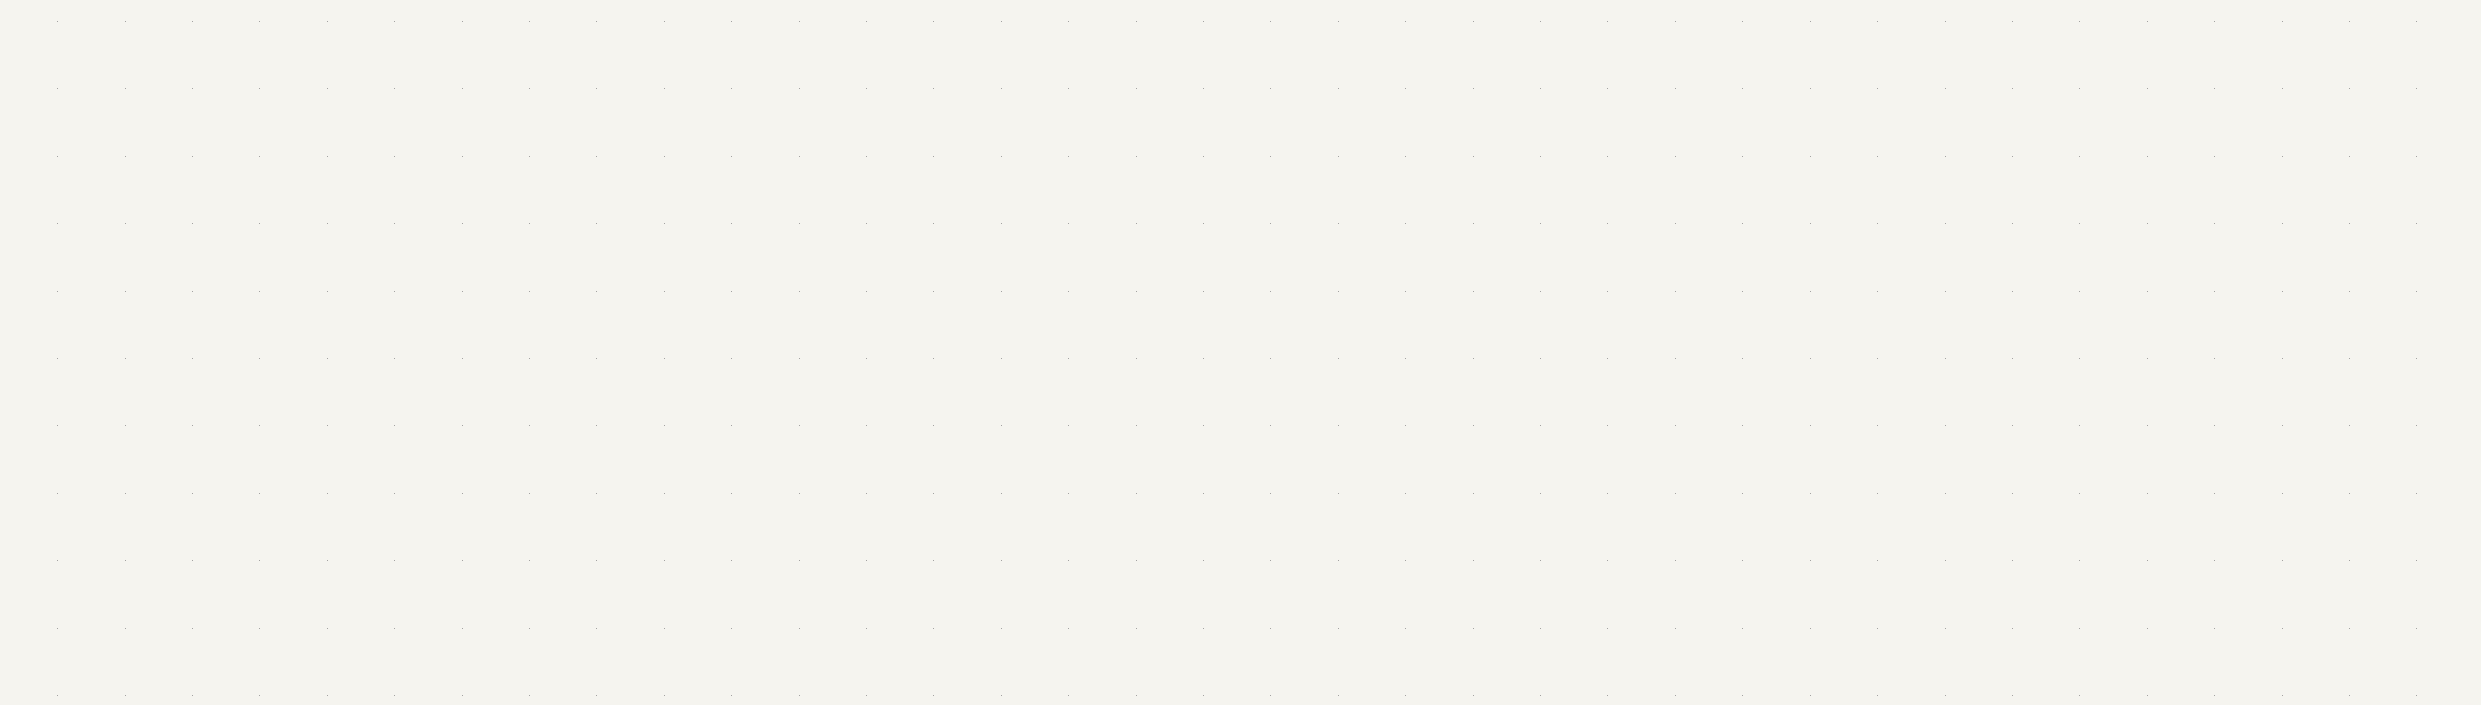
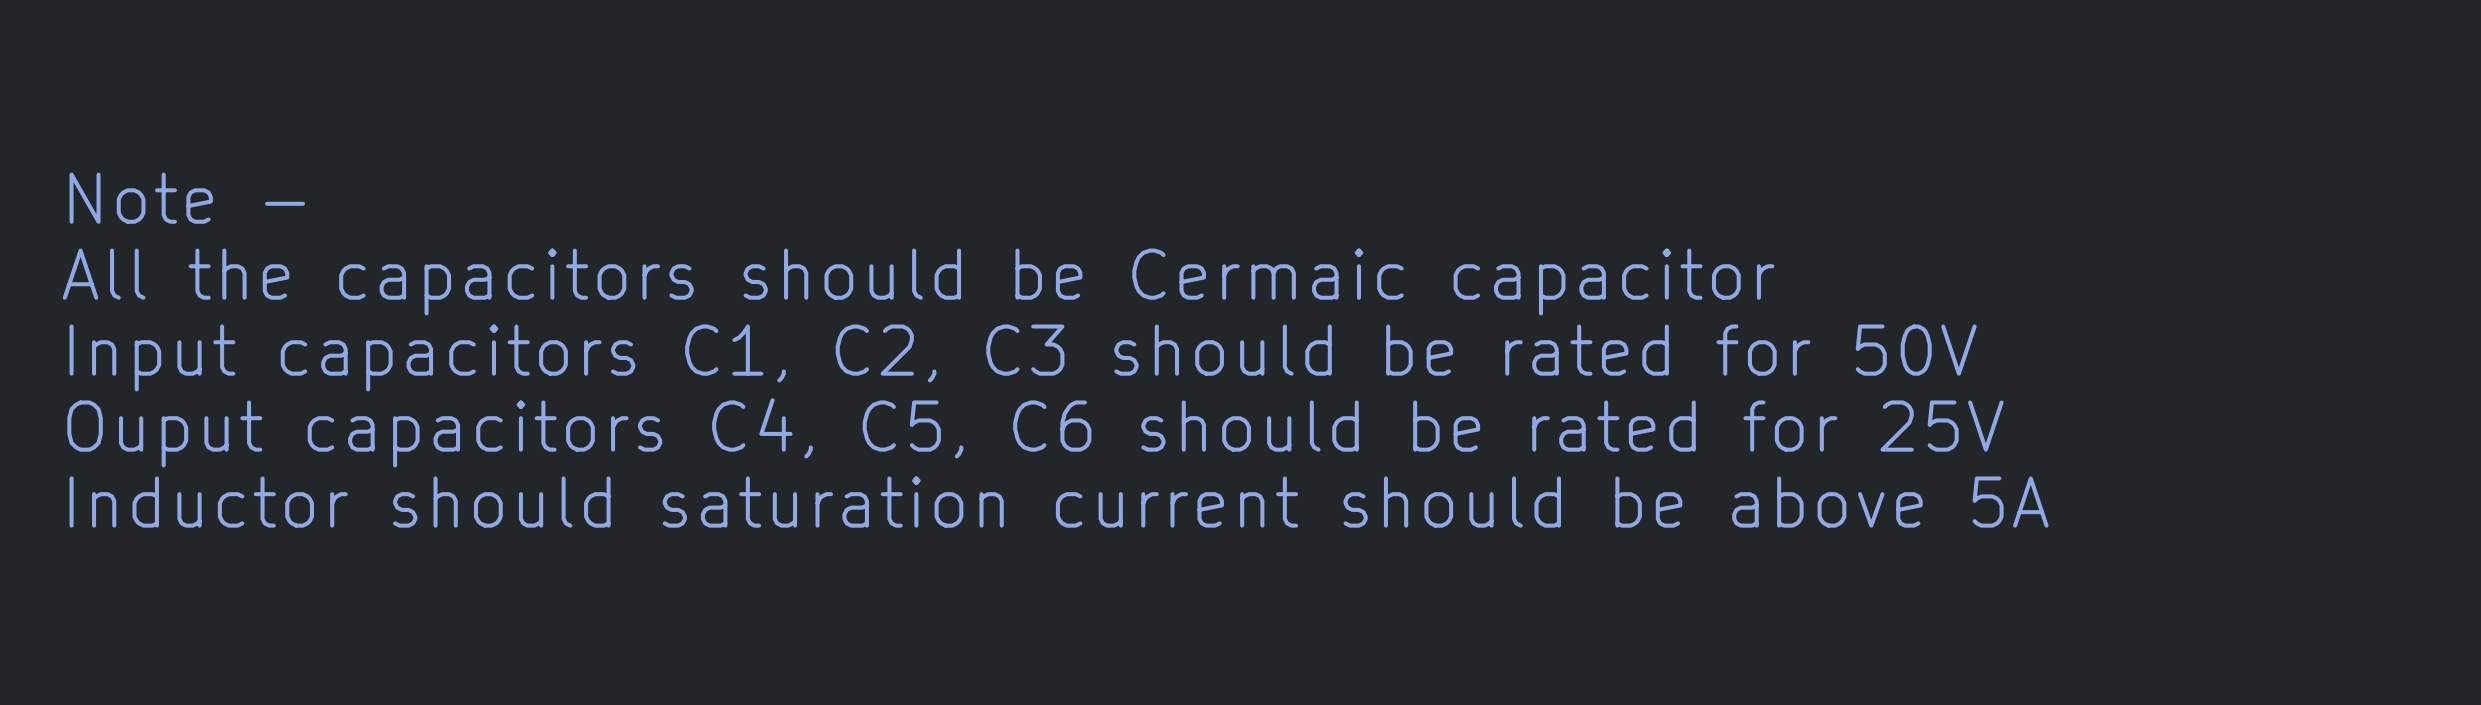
text: none -> Note - (187, 198)
text: none -> All the capacitors should be Cermaic capacitor (918, 282)
text: none -> Input capacitors C1, C2, C3 should be rated for 50V (1023, 357)
text: none -> Ouput capacitors C4, C5, C6 should be rated for 25V (1035, 432)
text: none -> Inductor should saturation current should be above 5A (1059, 502)

